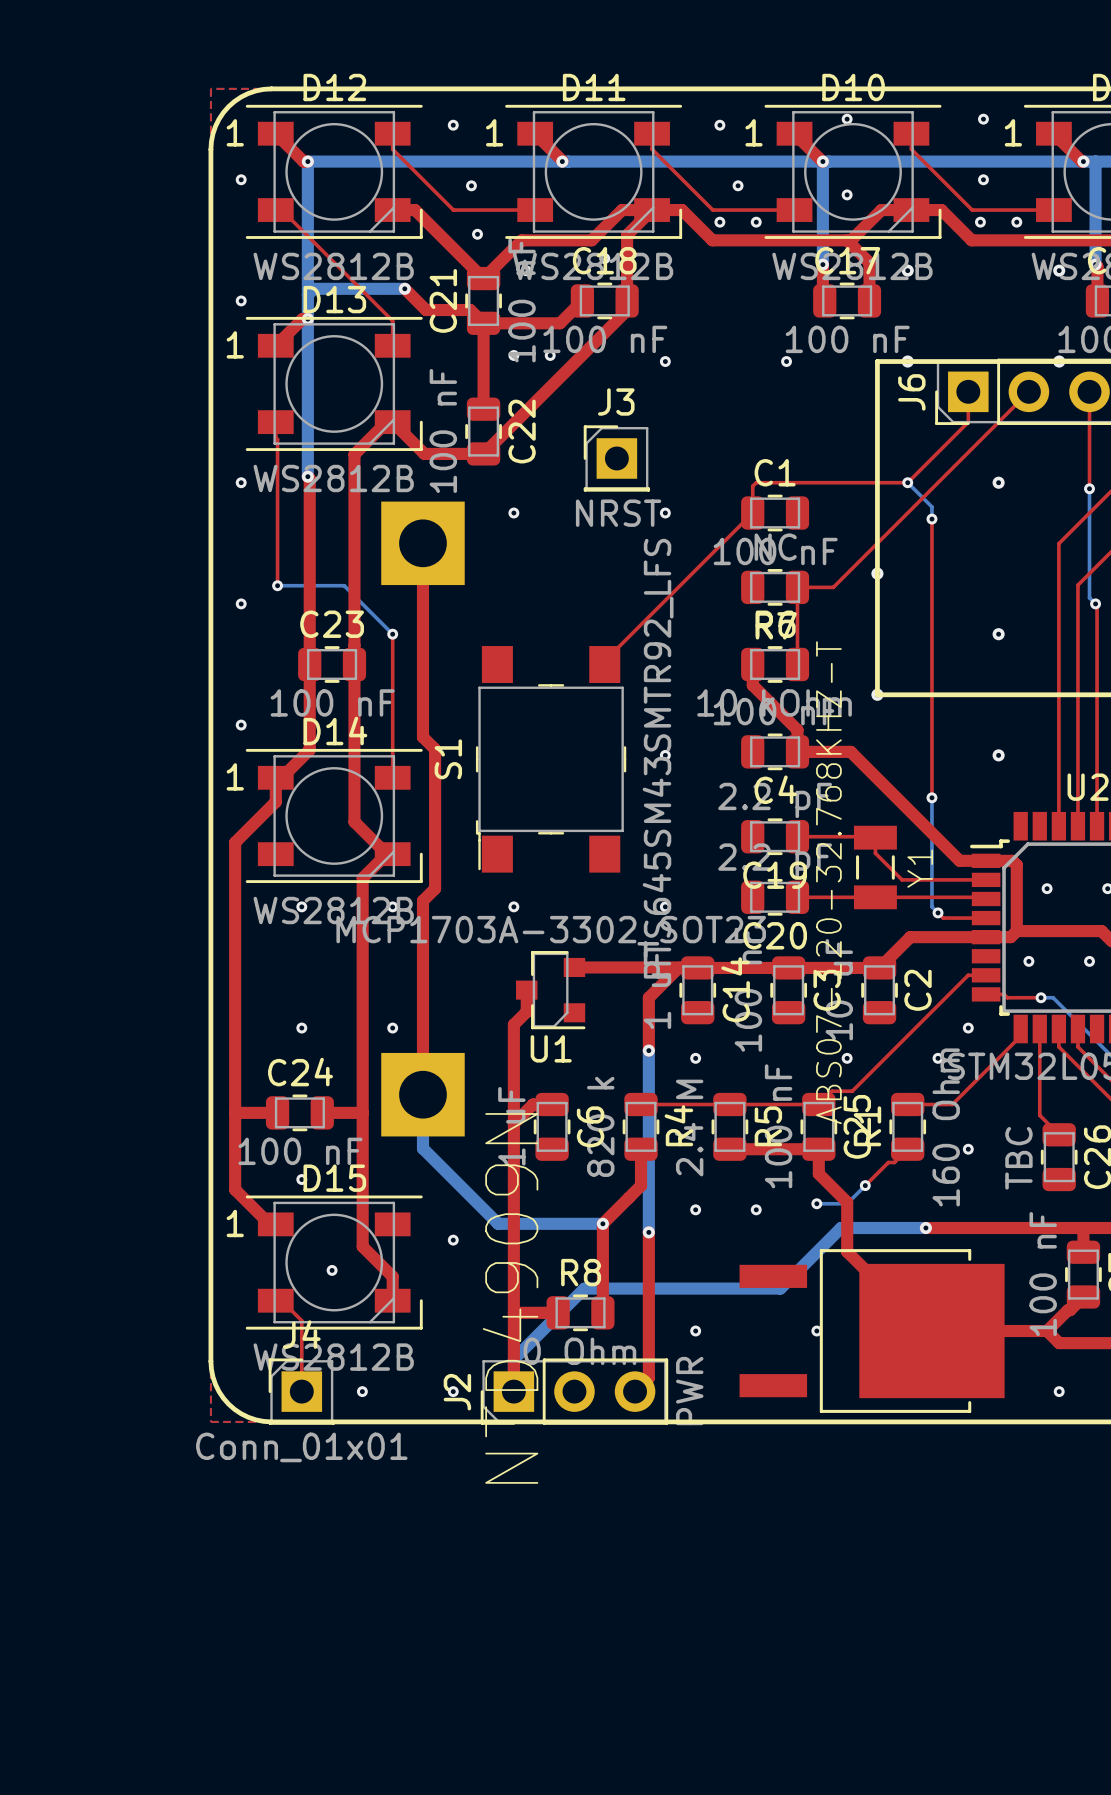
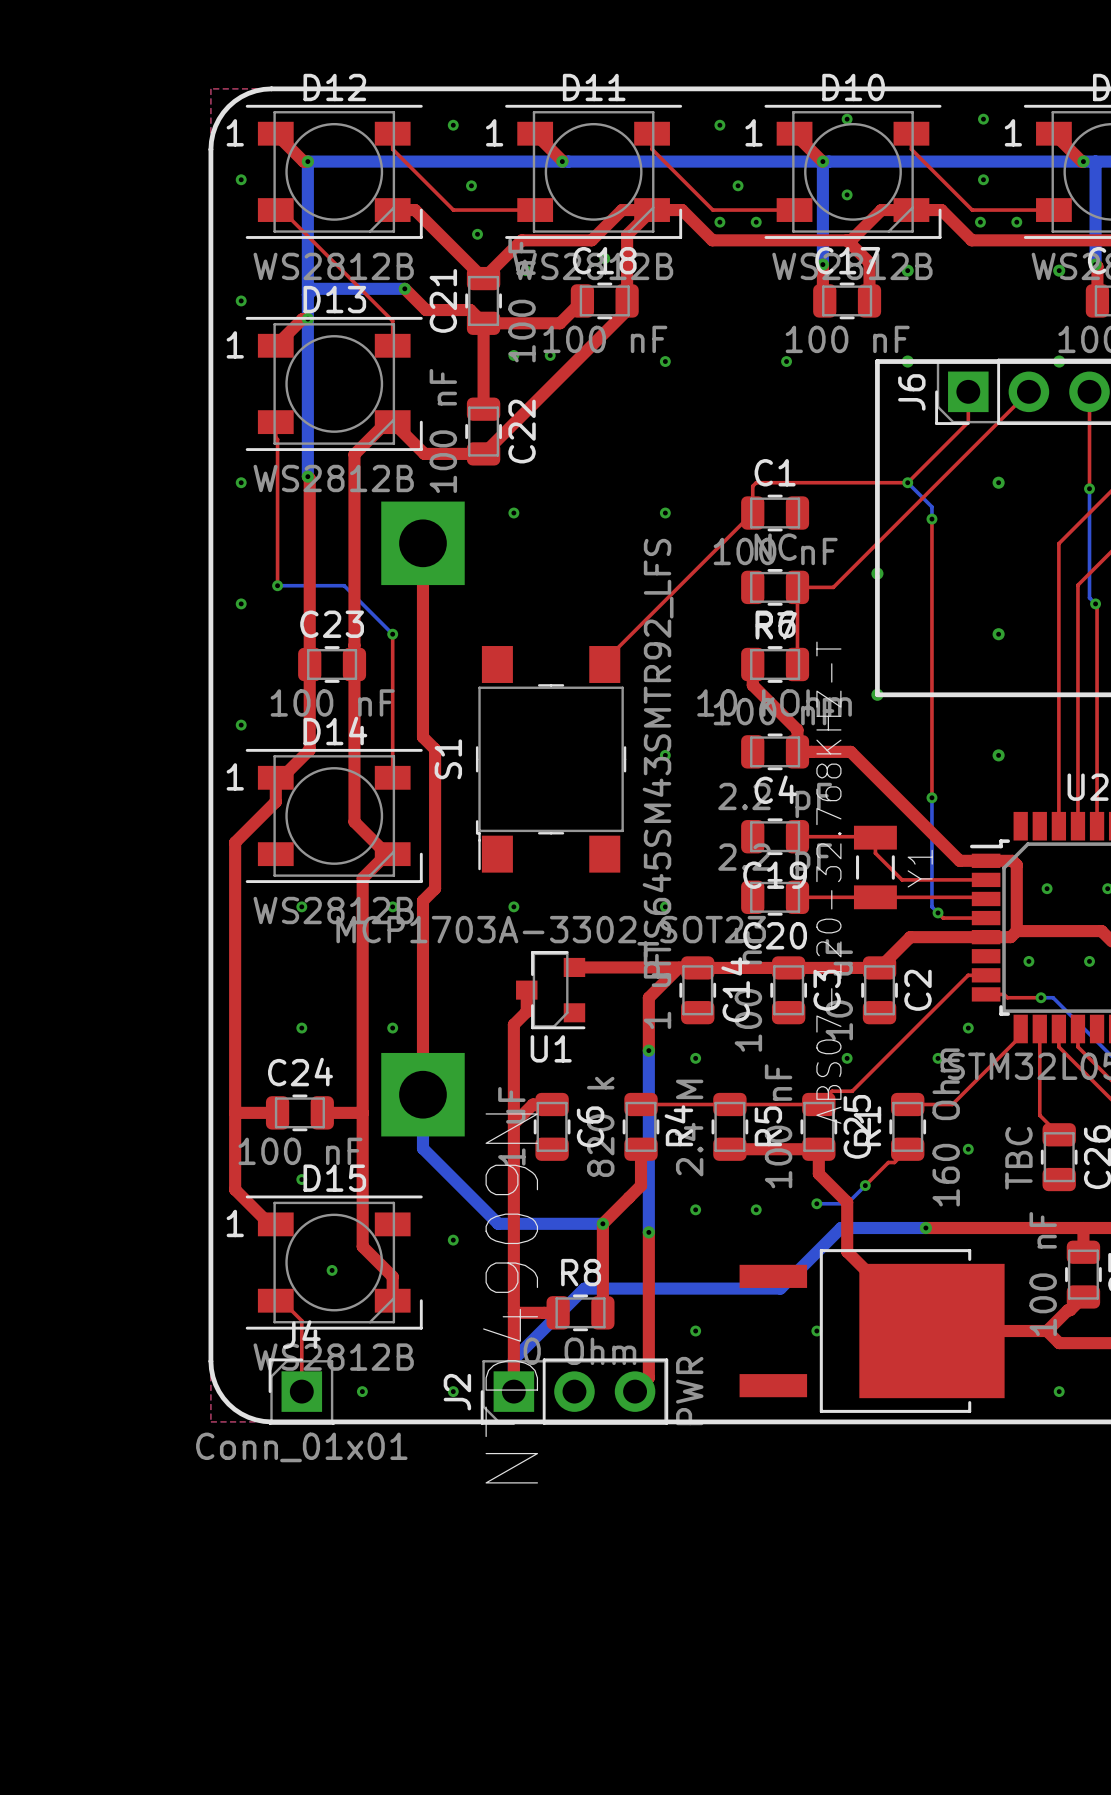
J3: NRST (616, 458) -> none

